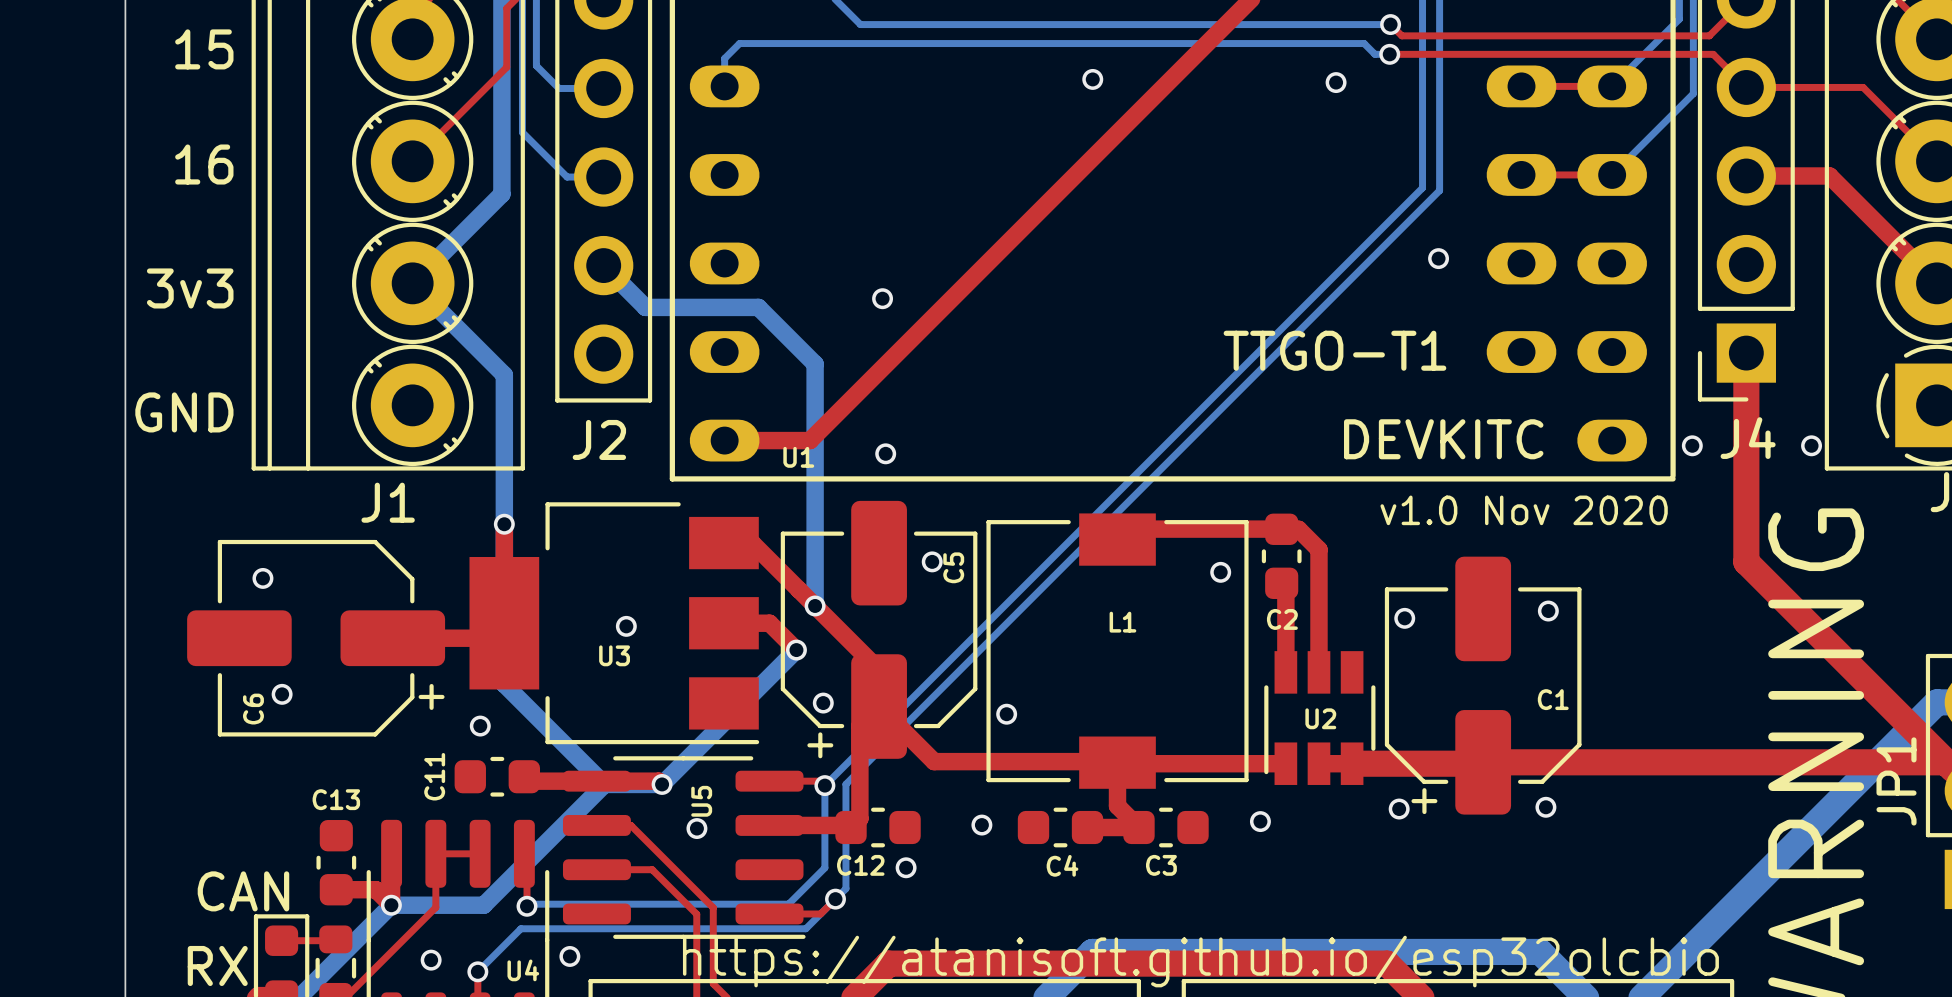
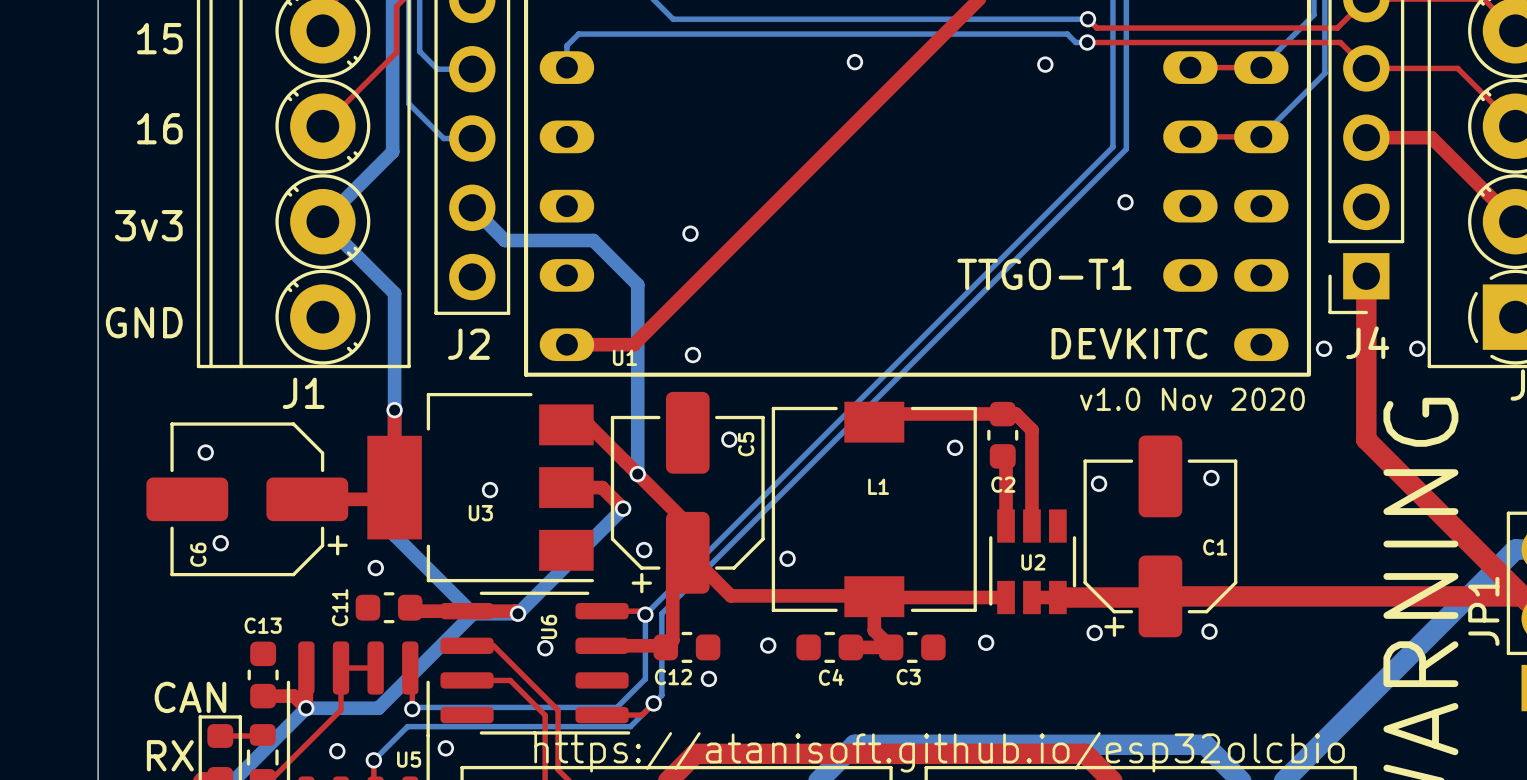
U5 name: U5 (701, 801) -> U6 (548, 626)
U4 name: U4 (523, 970) -> U5 (409, 759)

